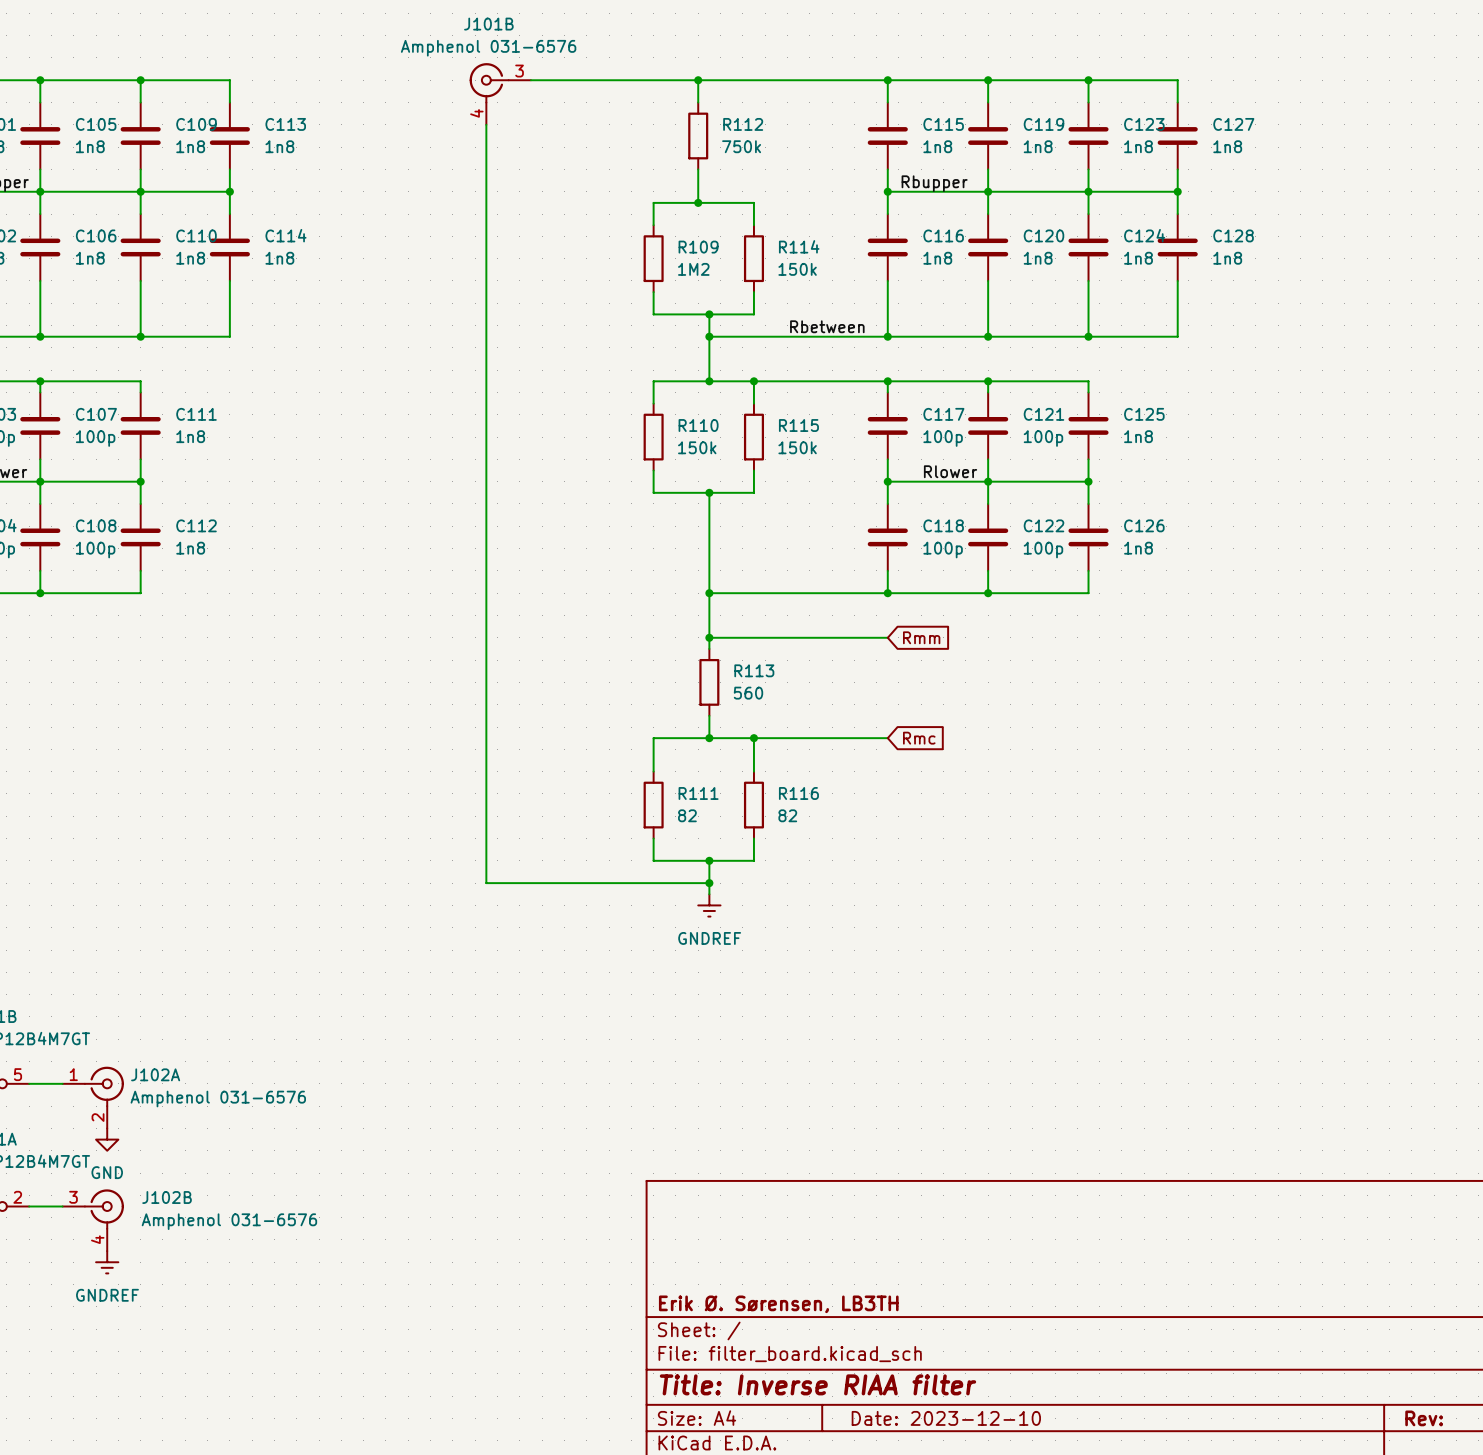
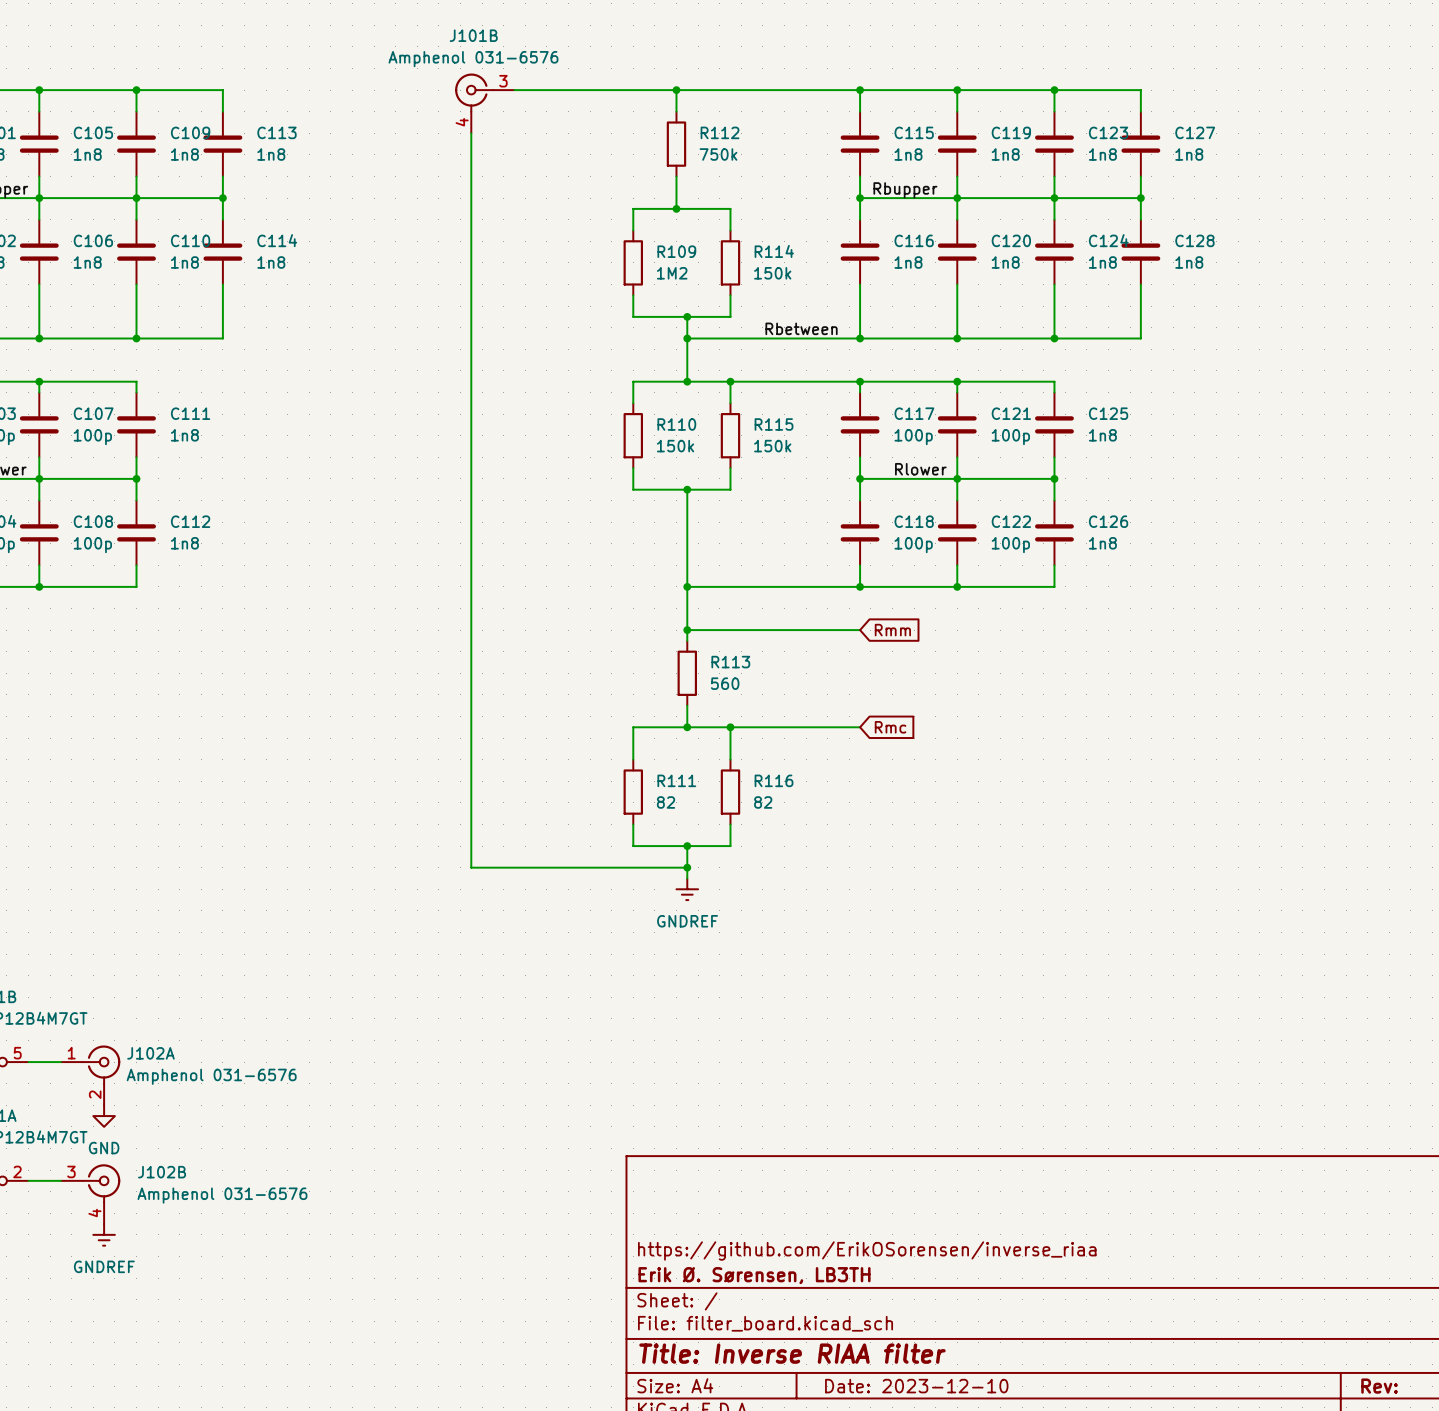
title block: none -> https://github.com/ErikOSorensen/inverse_riaa (867, 1251)

